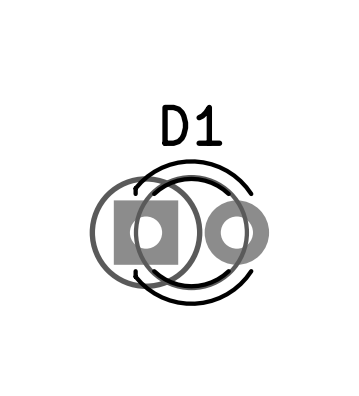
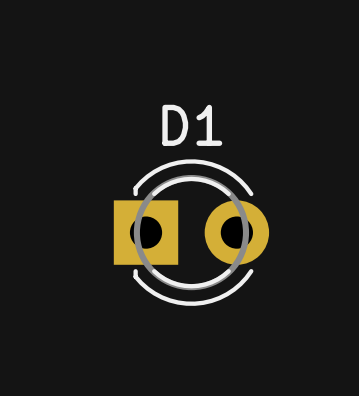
D1 footprint: [89, 159, 270, 306] -> [113, 159, 270, 306]

